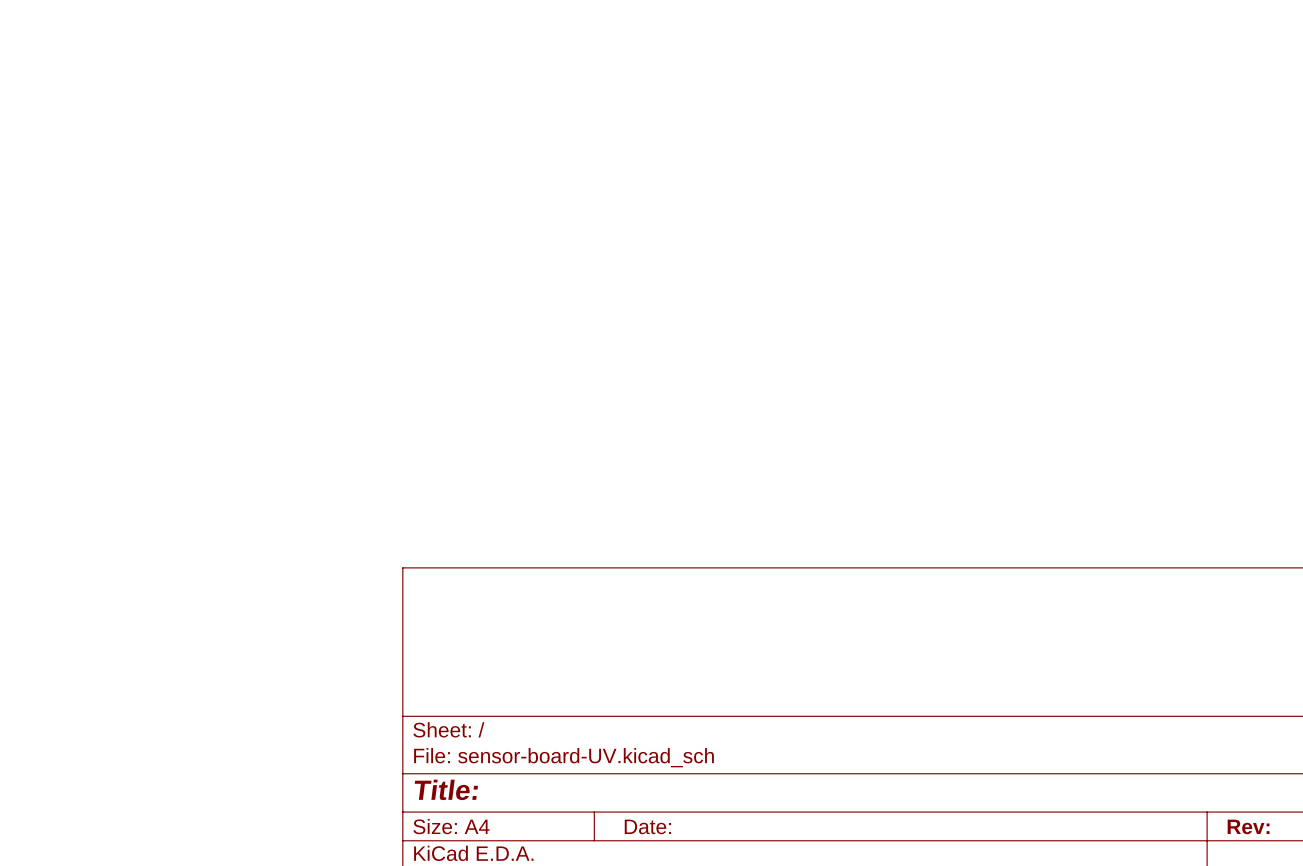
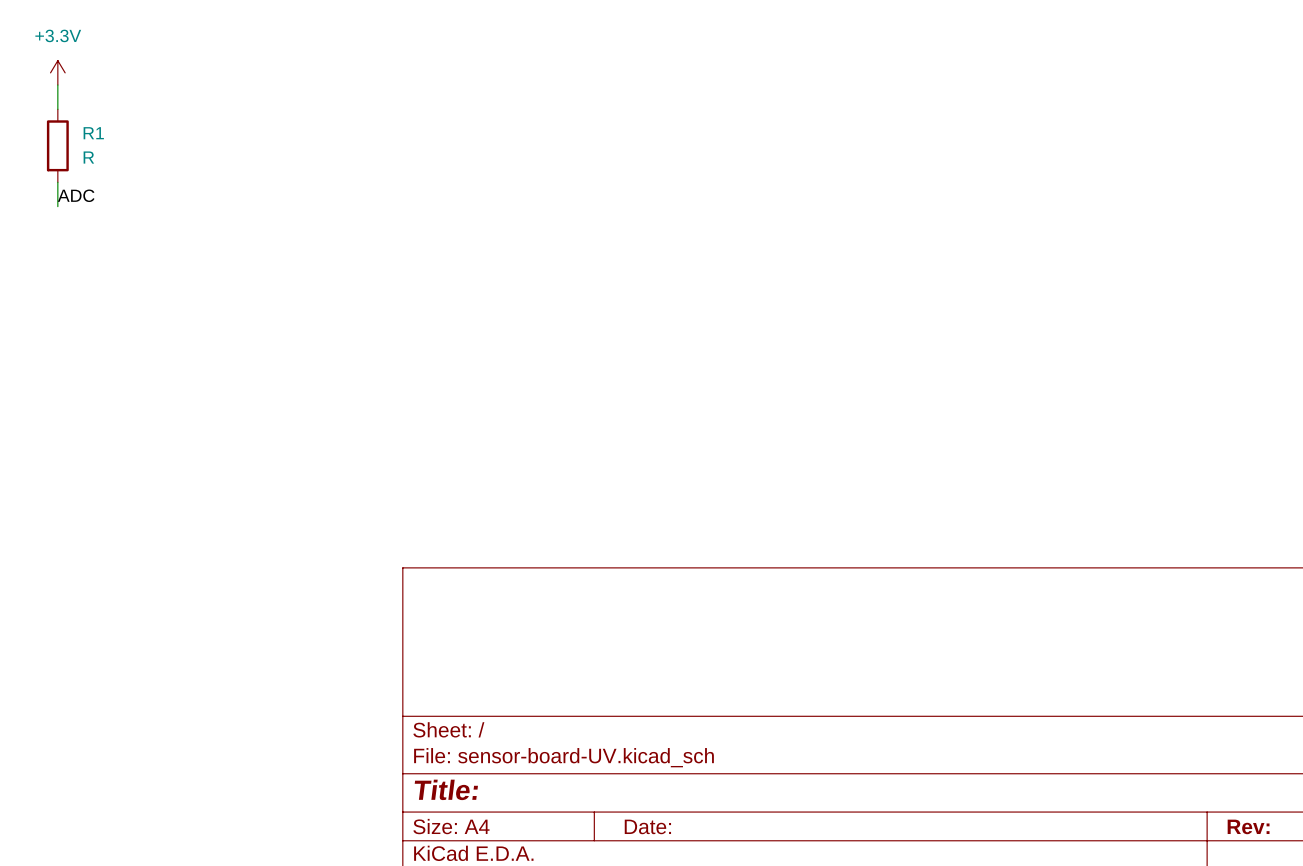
power symbol: none -> +3.3V (57, 72)
wire: none -> (57, 85) (57, 109)
R1: none -> R (57, 145)
wire: none -> (57, 182) (57, 206)
label: none -> ADC (76, 195)

